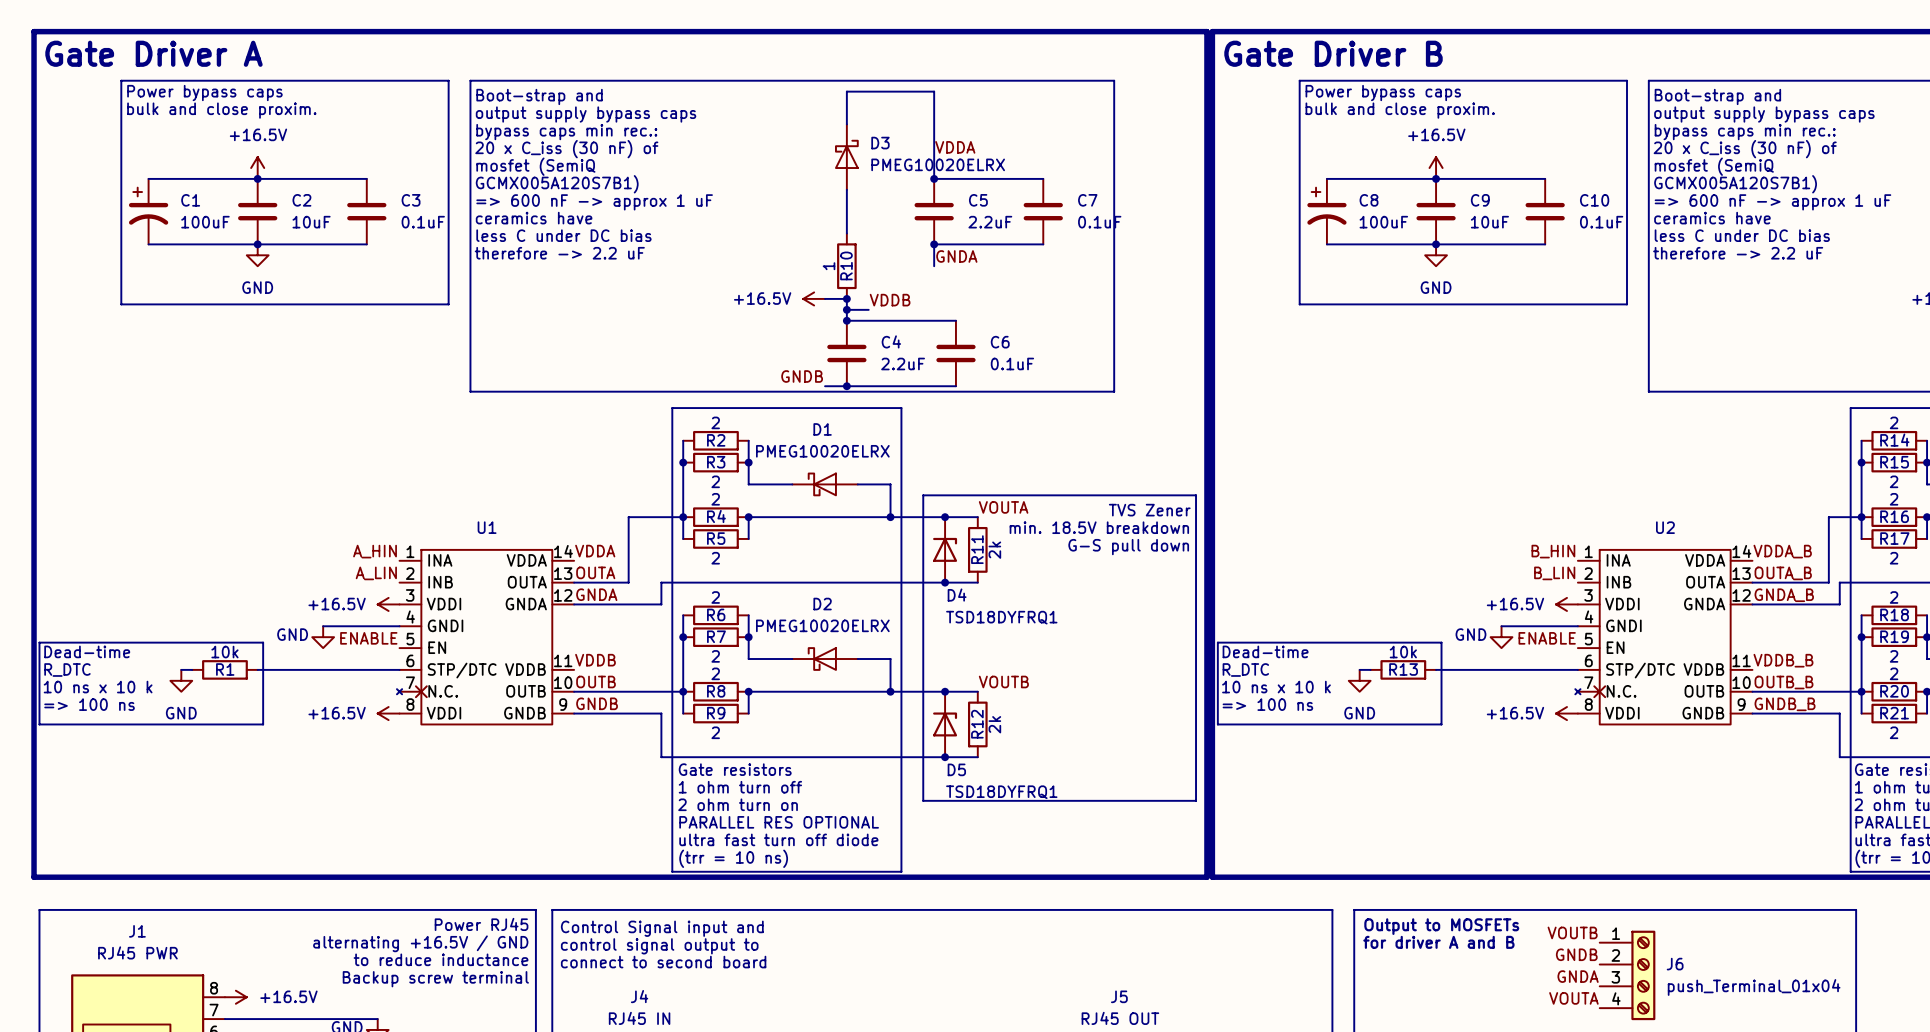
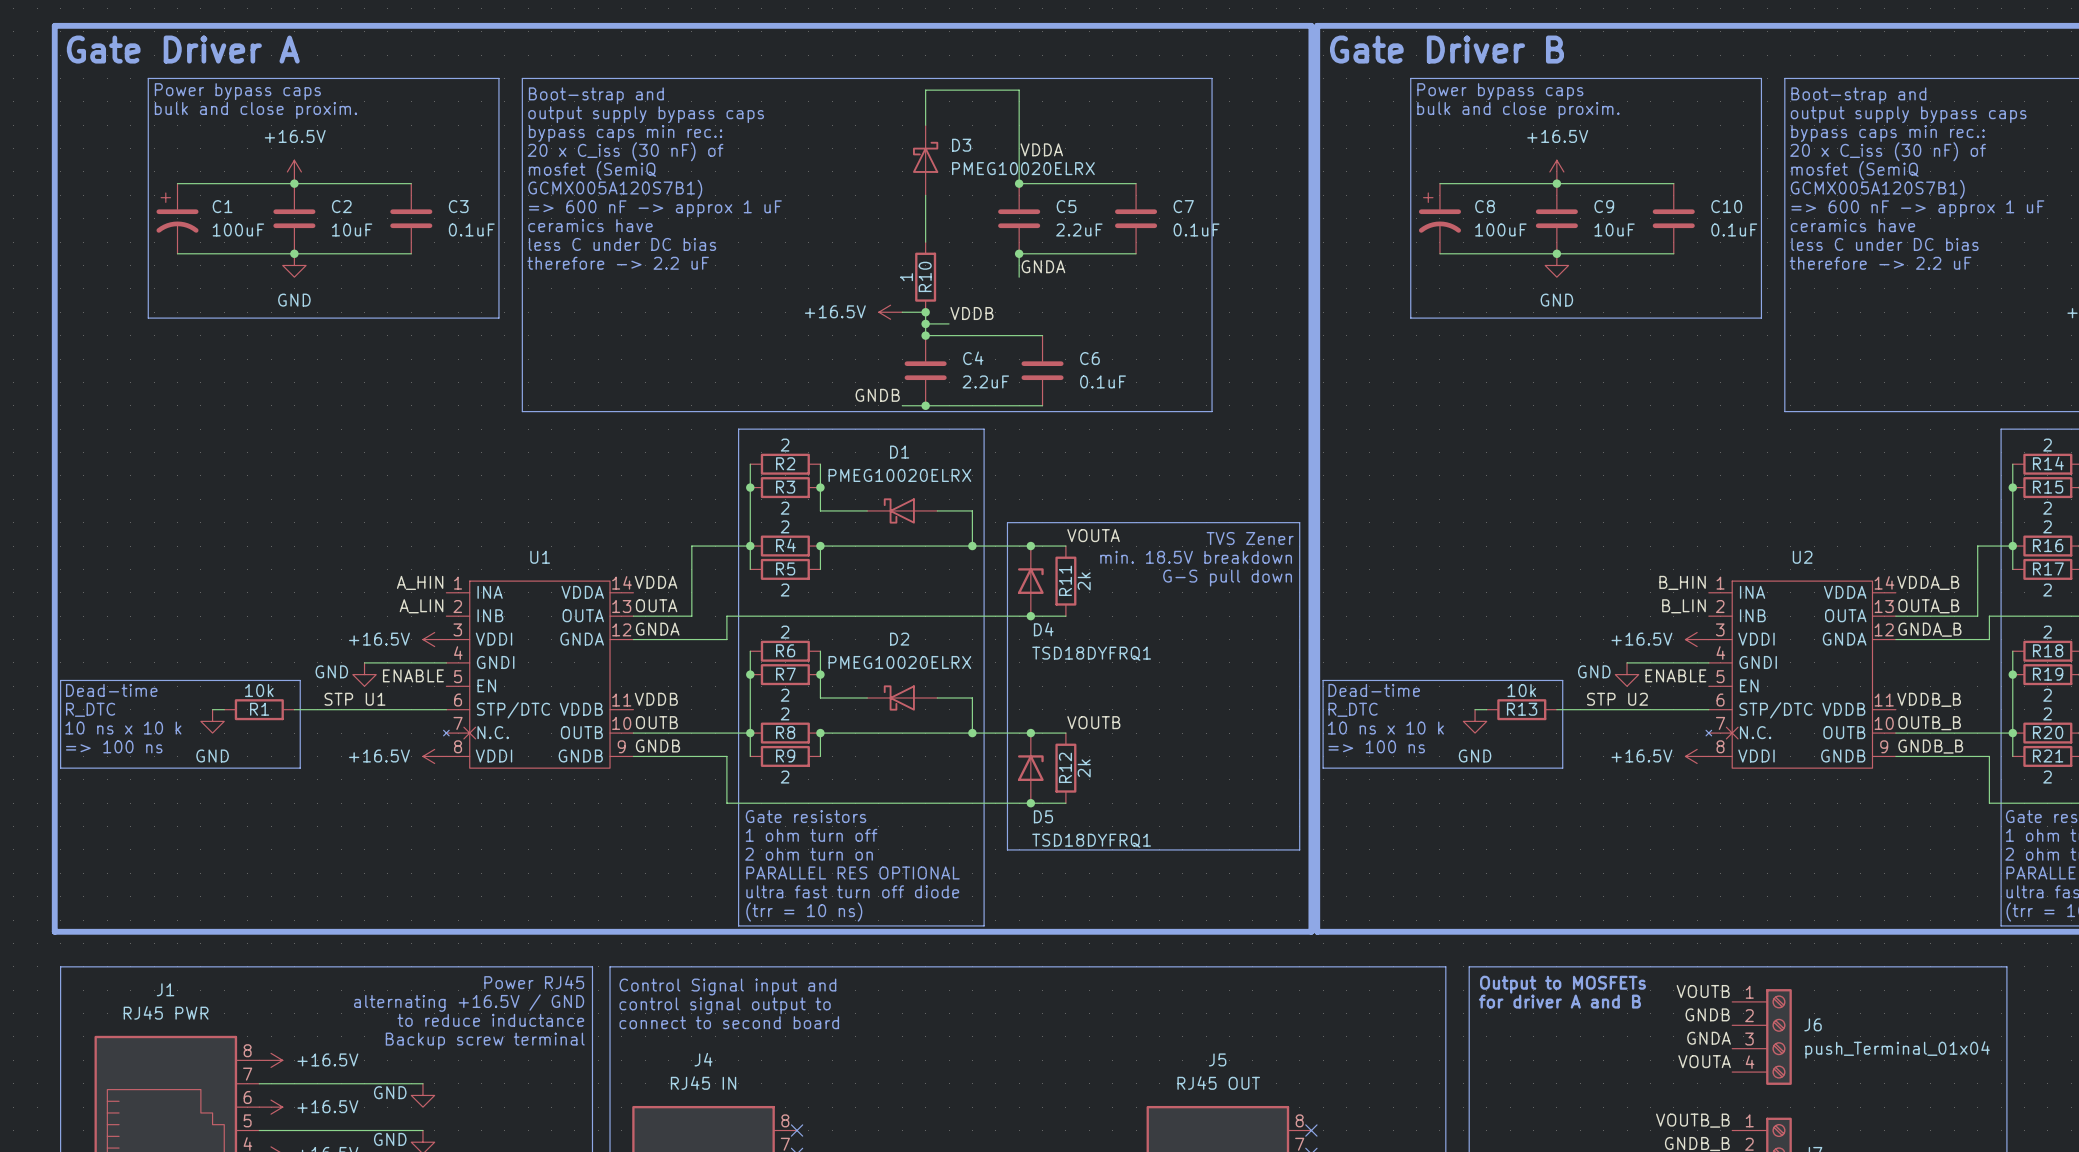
label: none -> STP U1 (354, 699)
label: none -> STP U2 (1617, 699)

